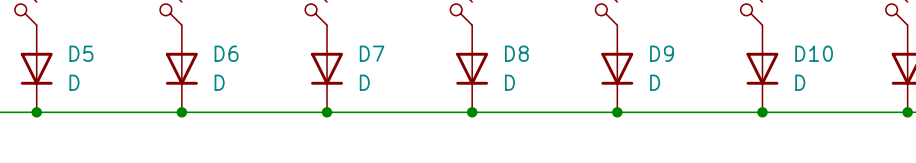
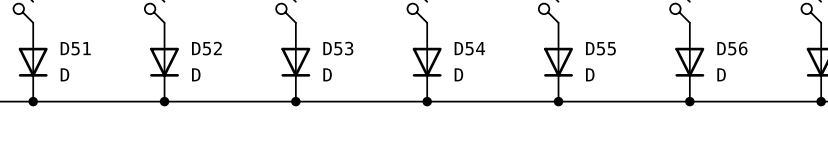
D5 name: D5 (81, 53) -> D51 (75, 48)
D6 name: D6 (226, 53) -> D52 (206, 48)
D7 name: D7 (372, 53) -> D53 (338, 48)
D8 name: D8 (516, 53) -> D54 (469, 48)
D9 name: D9 (662, 53) -> D55 (600, 48)
D10 name: D10 (814, 53) -> D56 (732, 48)

